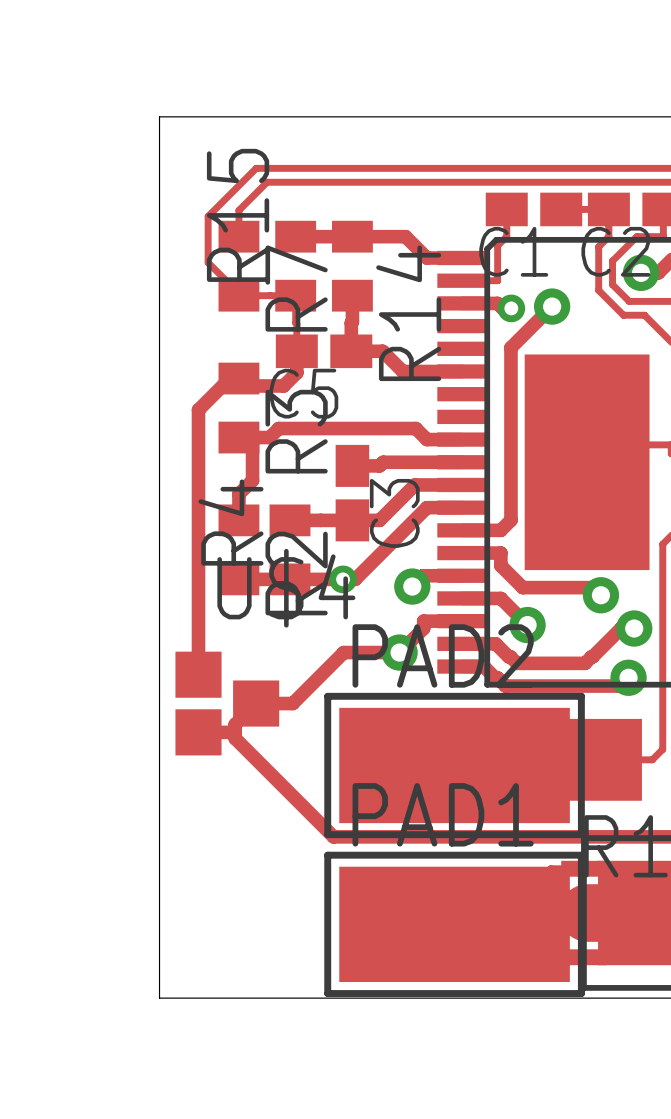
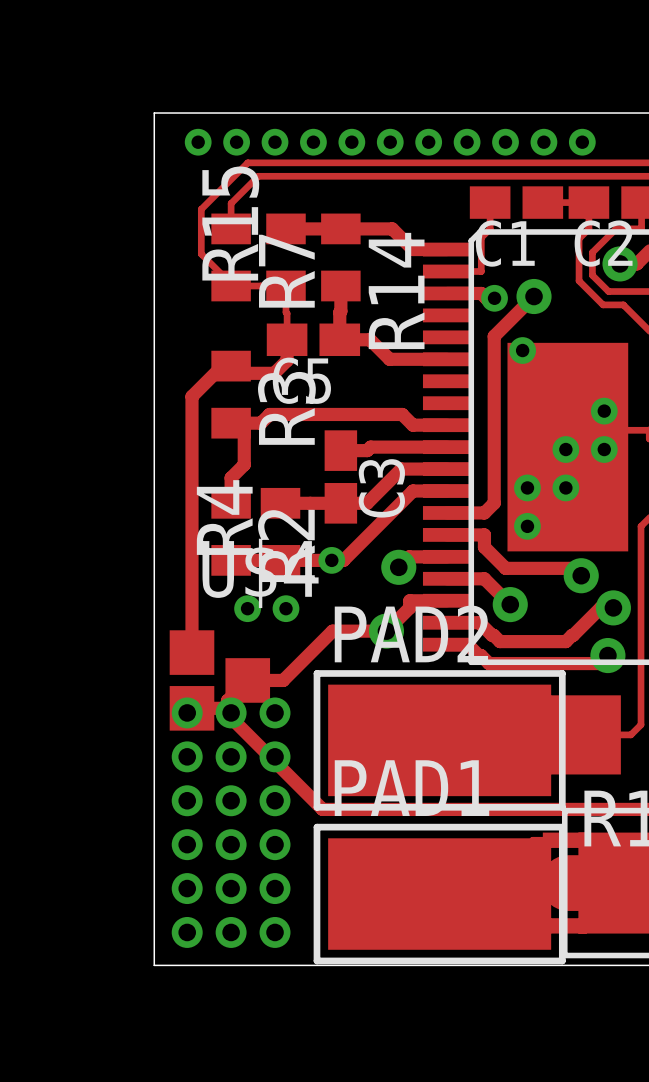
via: none -> (198, 142)
via: none -> (236, 142)
via: none -> (275, 142)
via: none -> (313, 142)
via: none -> (351, 142)
via: none -> (390, 142)
via: none -> (428, 142)
via: none -> (467, 142)
via: none -> (505, 142)
via: none -> (543, 142)
via: none -> (582, 142)
via: none -> (522, 350)
via: none -> (604, 411)
via: none -> (565, 449)
via: none -> (604, 449)
via: none -> (527, 487)
via: none -> (565, 487)
via: none -> (527, 526)
via: none -> (247, 608)
via: none -> (285, 608)
via: none -> (187, 712)
via: none -> (231, 712)
via: none -> (275, 712)
via: none -> (187, 756)
via: none -> (231, 756)
via: none -> (275, 756)
via: none -> (187, 800)
via: none -> (231, 800)
via: none -> (275, 800)
via: none -> (187, 844)
via: none -> (231, 844)
via: none -> (275, 844)
via: none -> (187, 888)
via: none -> (231, 888)
via: none -> (275, 888)
via: none -> (187, 932)
via: none -> (231, 932)
via: none -> (275, 932)

